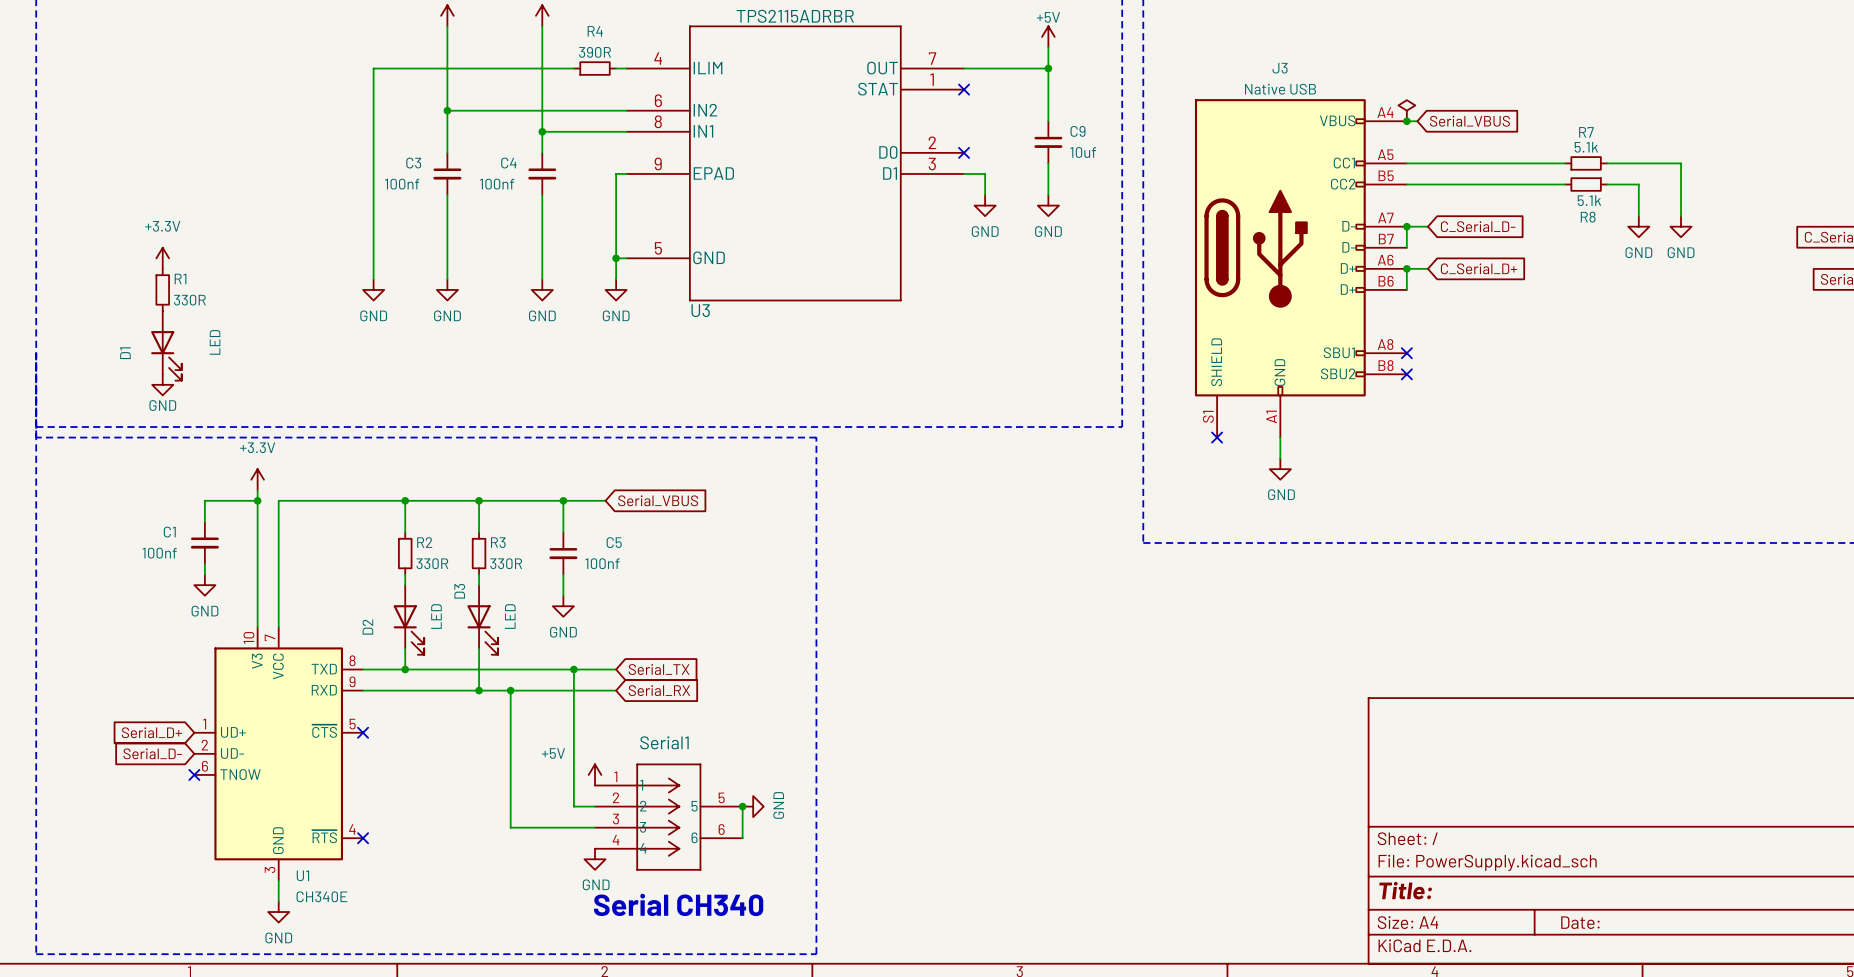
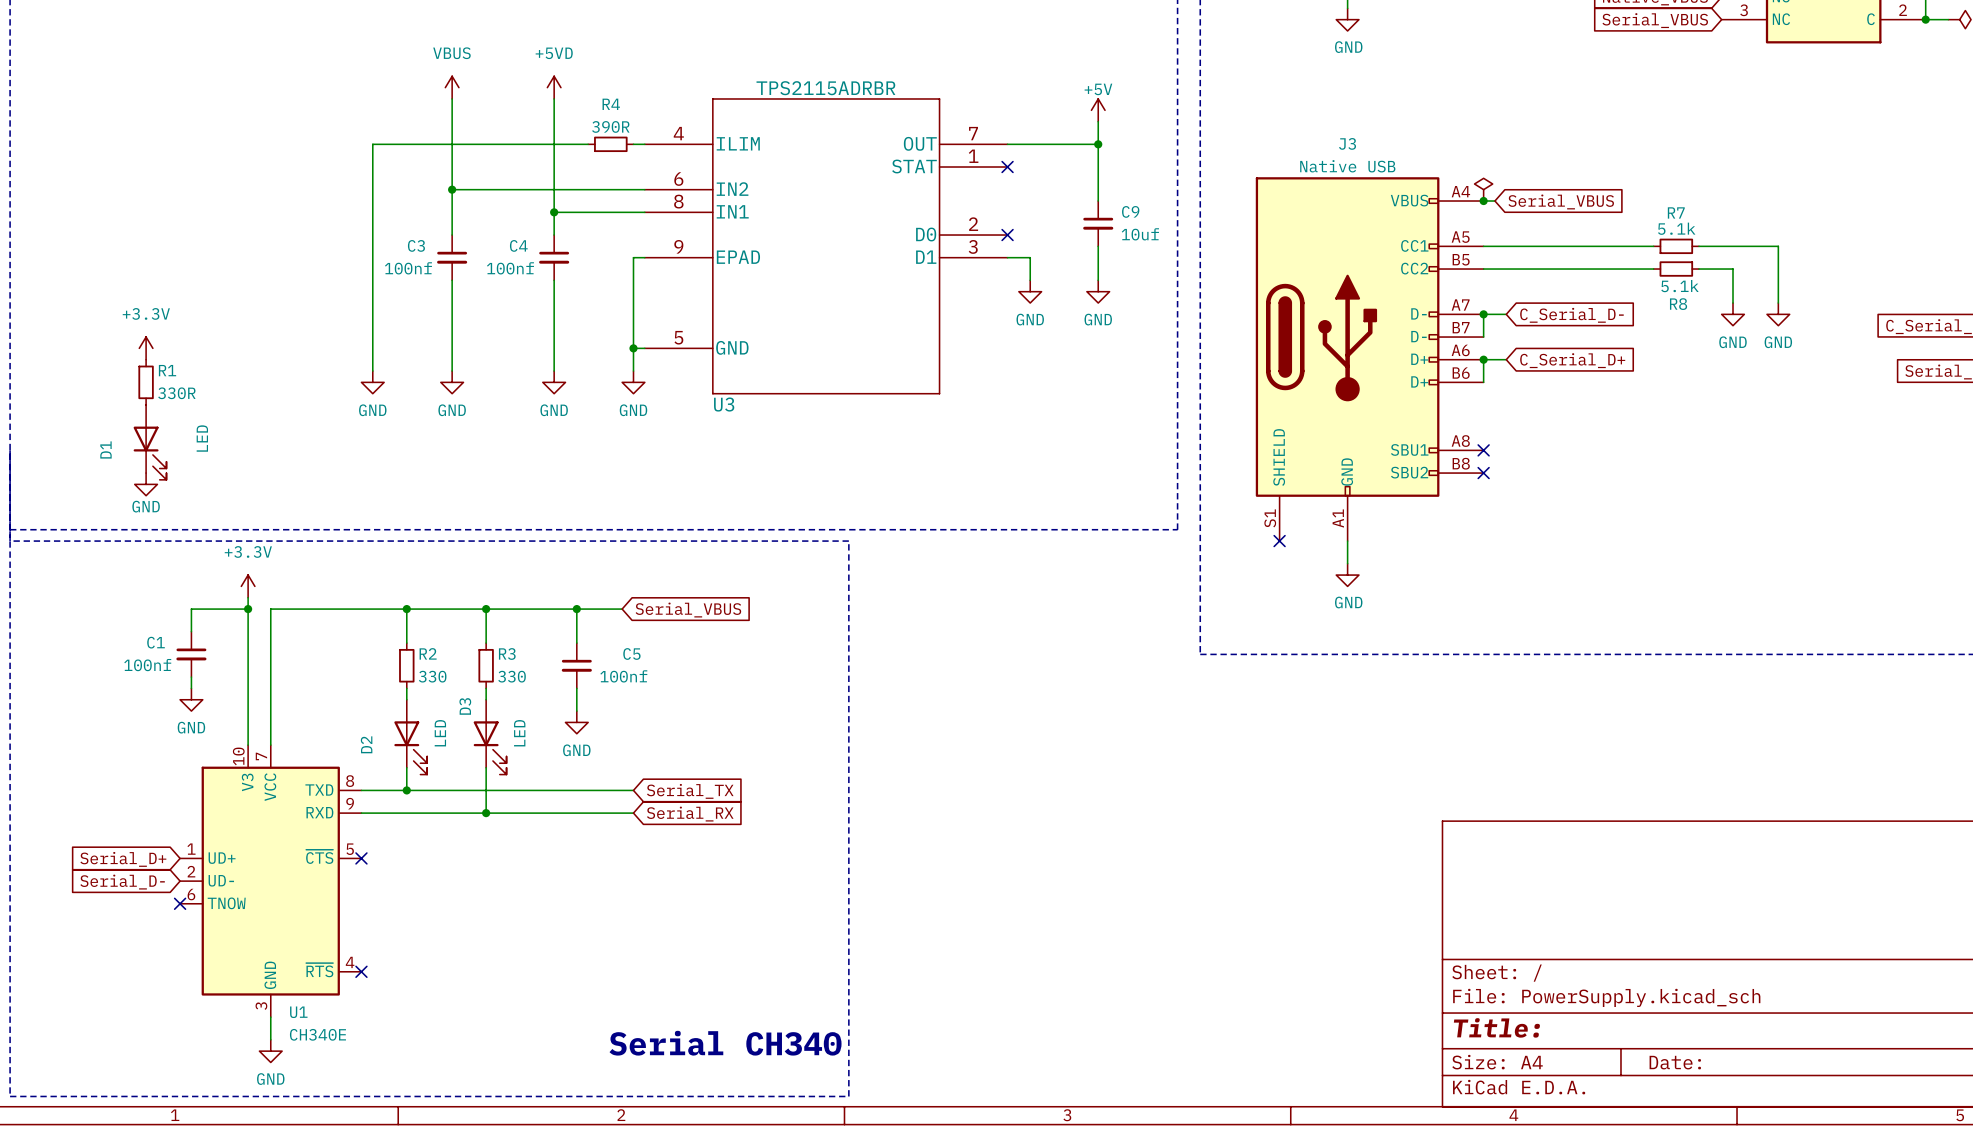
R2 value: 330R (432, 563) -> 330 (432, 676)
R3 value: 330R (506, 563) -> 330 (512, 676)
wire: (573, 669) (573, 806) (595, 806) -> none
junction: (573, 669) -> none
wire: (510, 690) (510, 827) (595, 827) -> none
junction: (510, 690) -> none
power symbol: +5V (595, 774) -> none
wire: (742, 806) (742, 838) -> none
junction: (742, 806) -> none
power symbol: GND (753, 806) -> none
Serial1: (668, 817) -> none
power symbol: GND (595, 859) -> none

